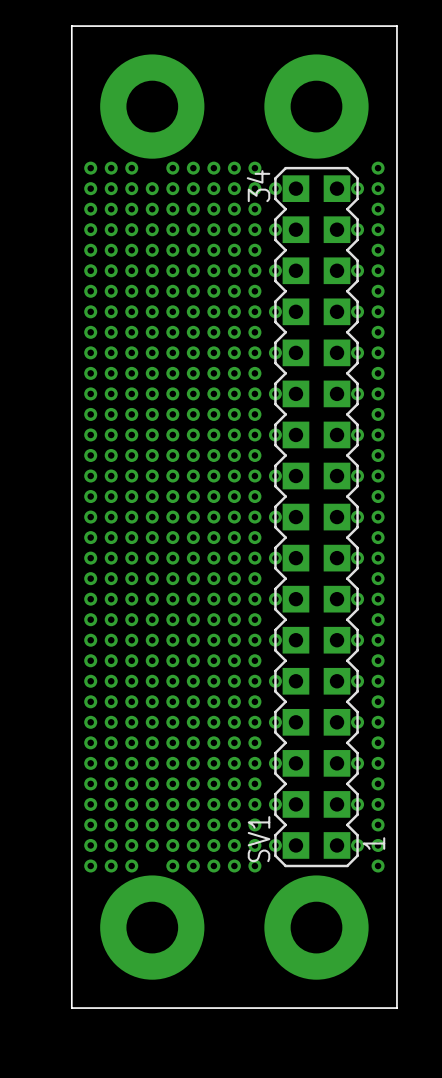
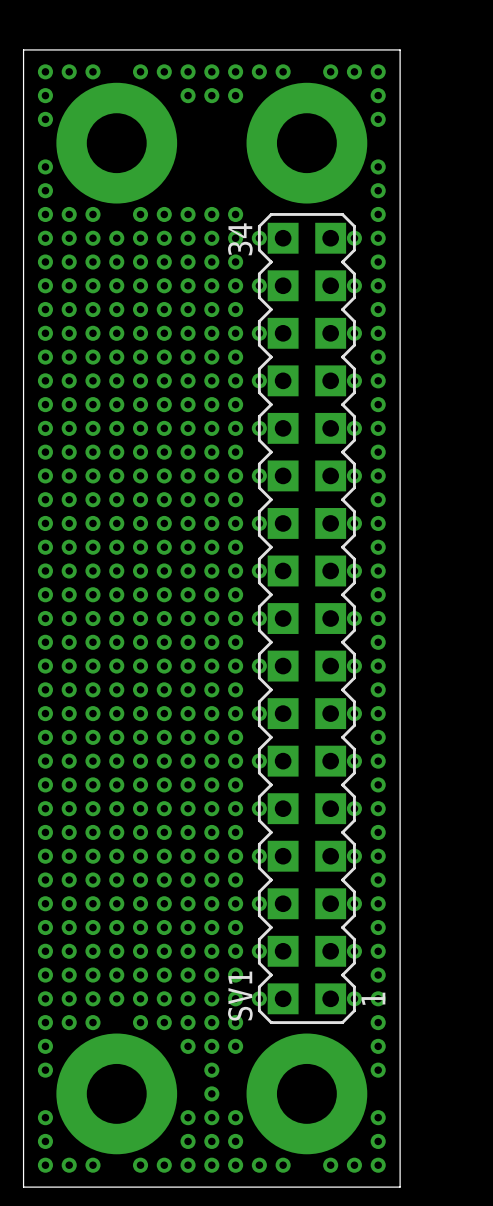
via: none -> (45, 71)
via: none -> (69, 71)
via: none -> (92, 71)
via: none -> (140, 71)
via: none -> (164, 71)
via: none -> (188, 71)
via: none -> (211, 71)
via: none -> (235, 71)
via: none -> (259, 71)
via: none -> (283, 71)
via: none -> (330, 71)
via: none -> (354, 71)
via: none -> (378, 71)
via: none -> (45, 95)
via: none -> (188, 95)
via: none -> (211, 95)
via: none -> (235, 95)
via: none -> (378, 95)
via: none -> (45, 119)
via: none -> (378, 119)
via: none -> (45, 166)
via: none -> (378, 166)
via: none -> (45, 190)
via: none -> (378, 190)
via: none -> (45, 1046)
via: none -> (188, 1046)
via: none -> (211, 1046)
via: none -> (235, 1046)
via: none -> (378, 1046)
via: none -> (45, 1070)
via: none -> (211, 1070)
via: none -> (378, 1070)
via: none -> (211, 1093)
via: none -> (45, 1117)
via: none -> (188, 1117)
via: none -> (211, 1117)
via: none -> (235, 1117)
via: none -> (378, 1117)
via: none -> (45, 1141)
via: none -> (188, 1141)
via: none -> (211, 1141)
via: none -> (235, 1141)
via: none -> (378, 1141)
via: none -> (45, 1165)
via: none -> (69, 1165)
via: none -> (92, 1165)
via: none -> (140, 1165)
via: none -> (164, 1165)
via: none -> (188, 1165)
via: none -> (211, 1165)
via: none -> (235, 1165)
via: none -> (259, 1165)
via: none -> (283, 1165)
via: none -> (330, 1165)
via: none -> (354, 1165)
via: none -> (378, 1165)

